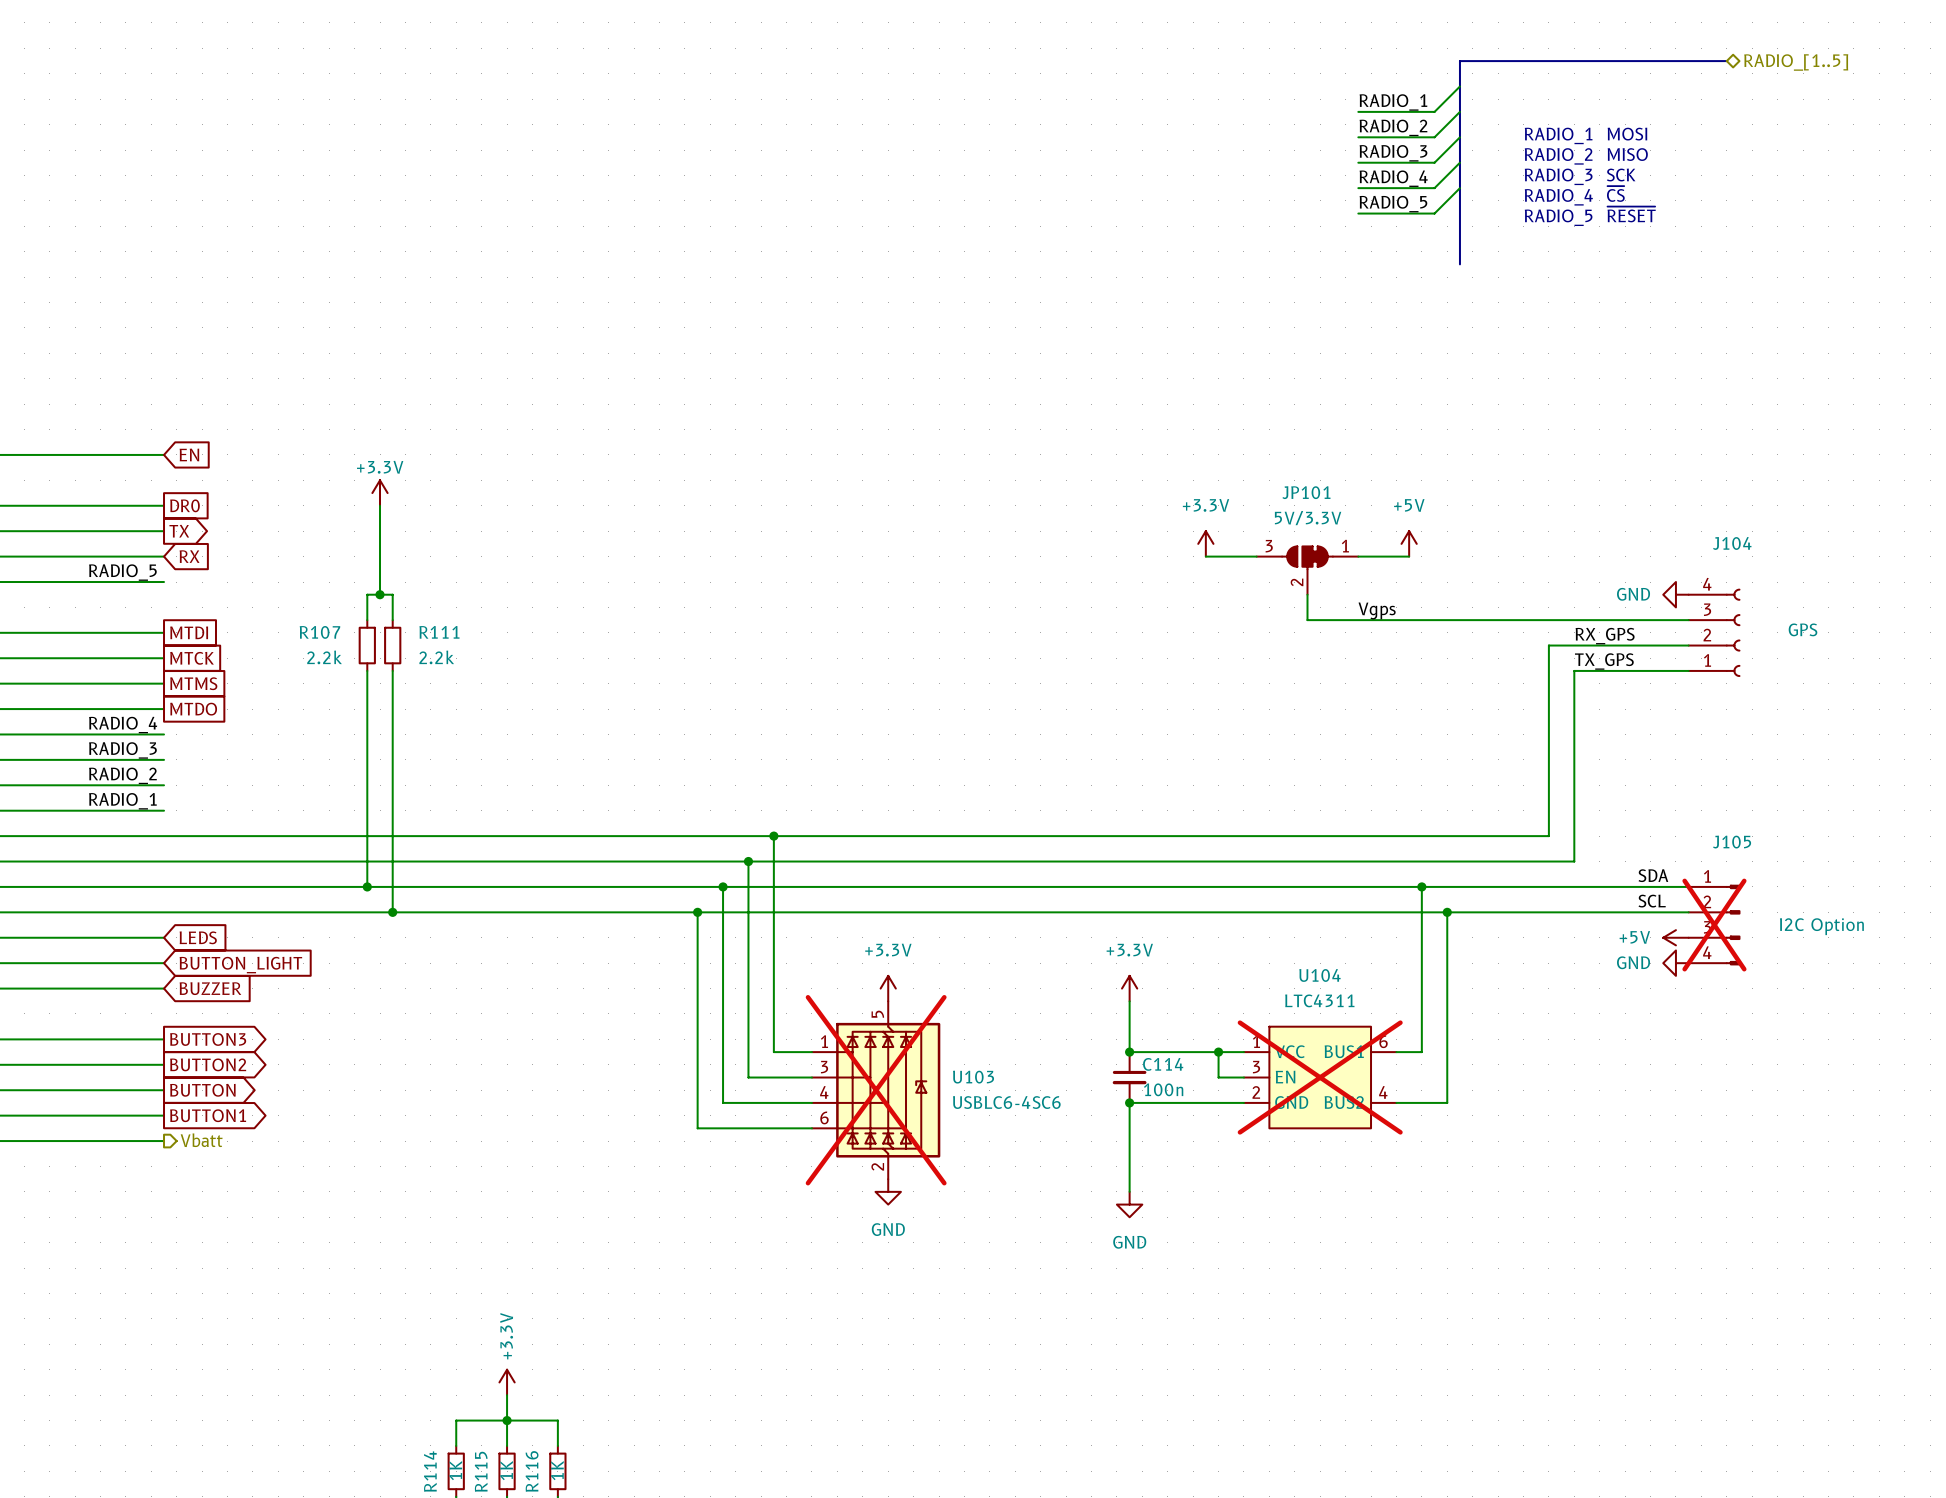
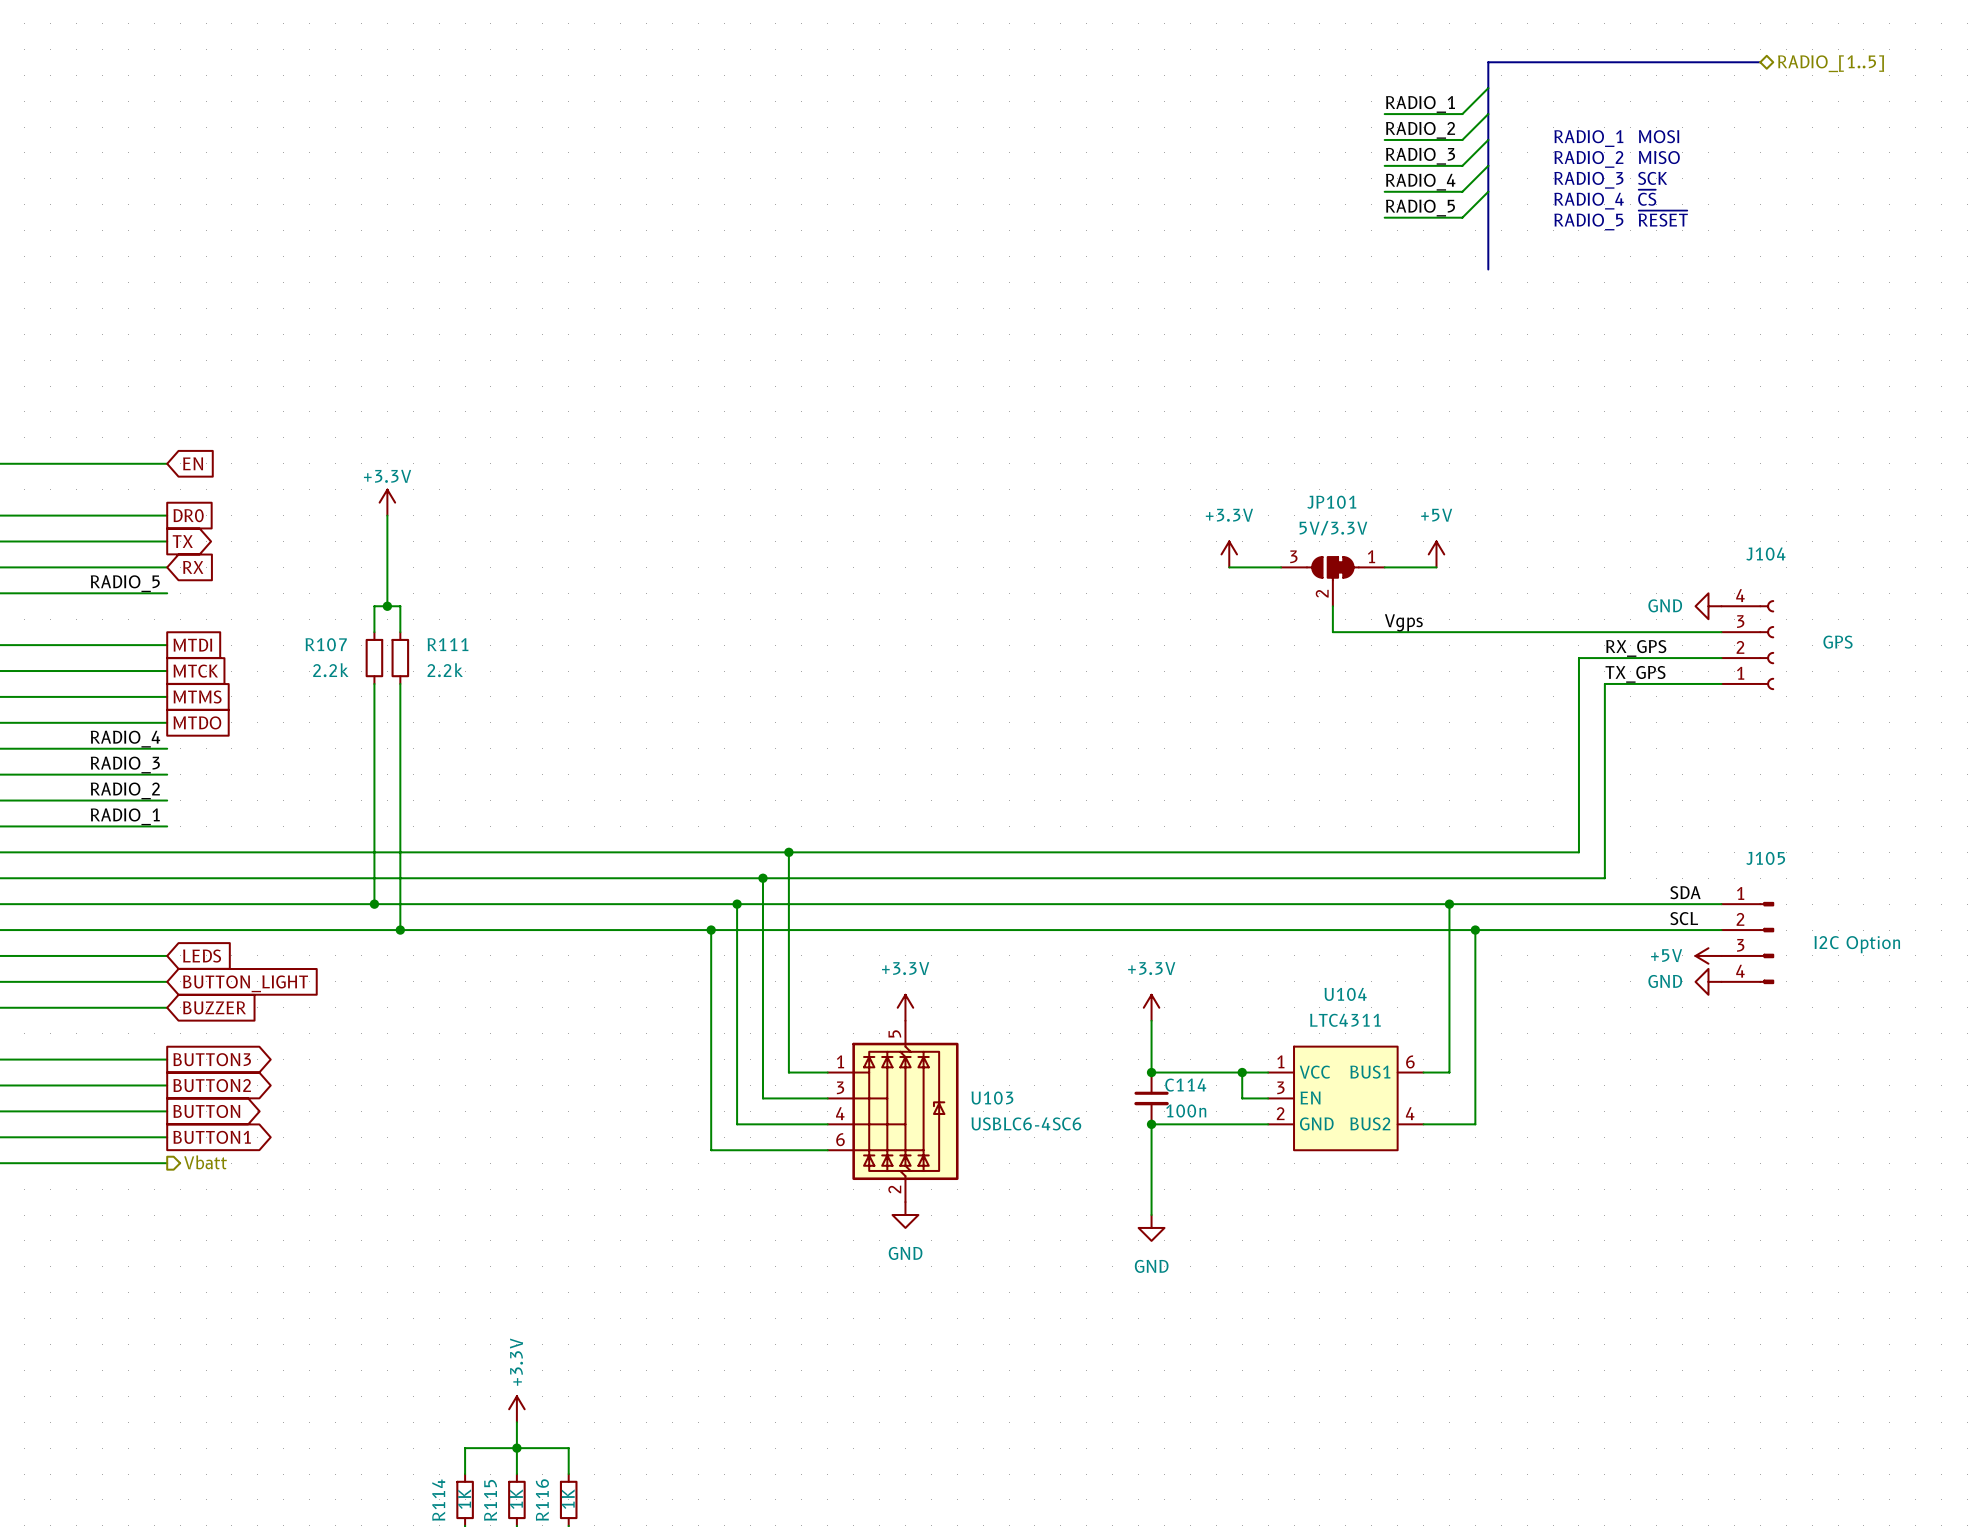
J105 do-not-place cross: (1714, 925) -> none
U104 do-not-place cross: (1320, 1077) -> none
U103 do-not-place cross: (876, 1090) -> none

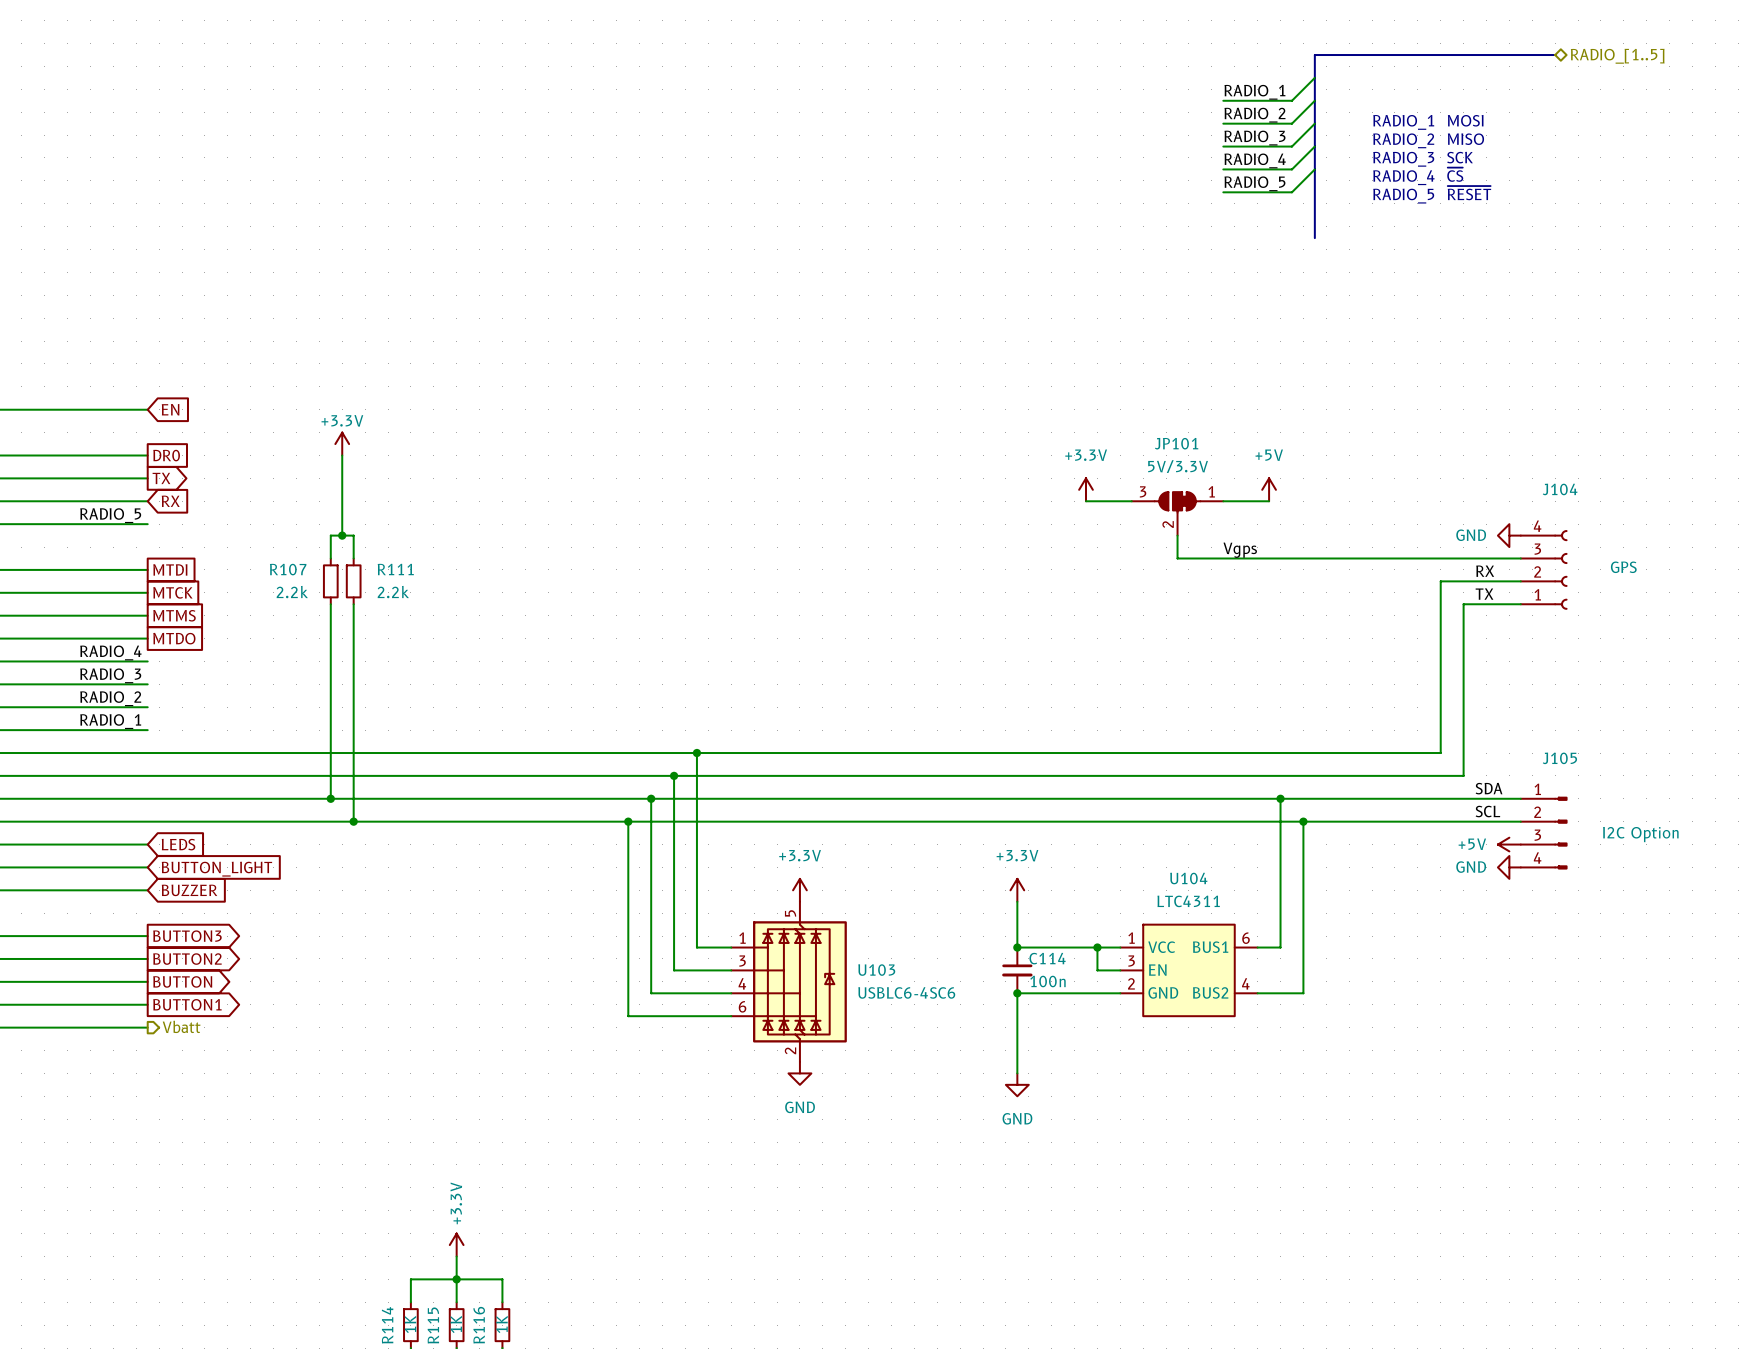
label: none -> RX (1485, 571)
label: RX_GPS (1636, 648) -> none
wire: (1630, 658) (1578, 658) (1578, 852) -> (1440, 581) (1440, 753) (1394, 753)
label: none -> TX (1484, 594)
label: TX_GPS (1635, 674) -> none
wire: (1656, 683) (1604, 683) (1604, 878) -> (1463, 604) (1463, 775) (1417, 775)

